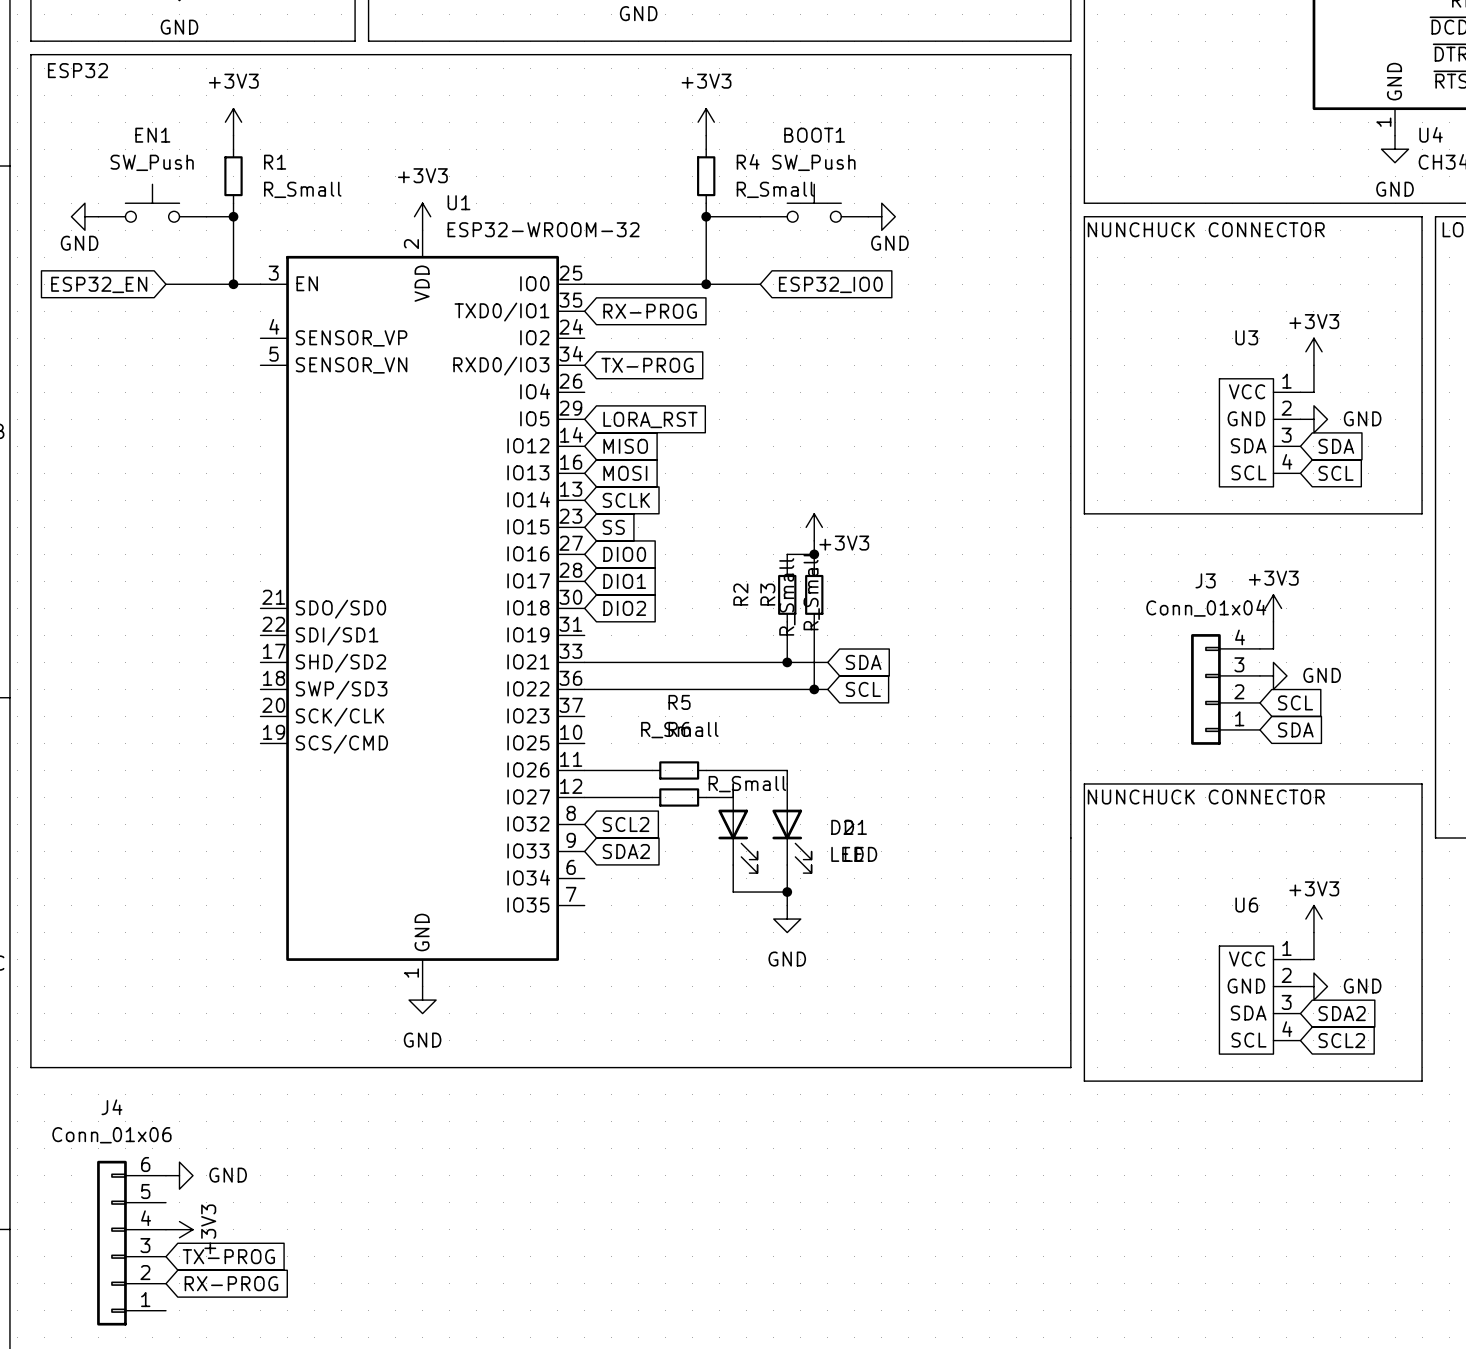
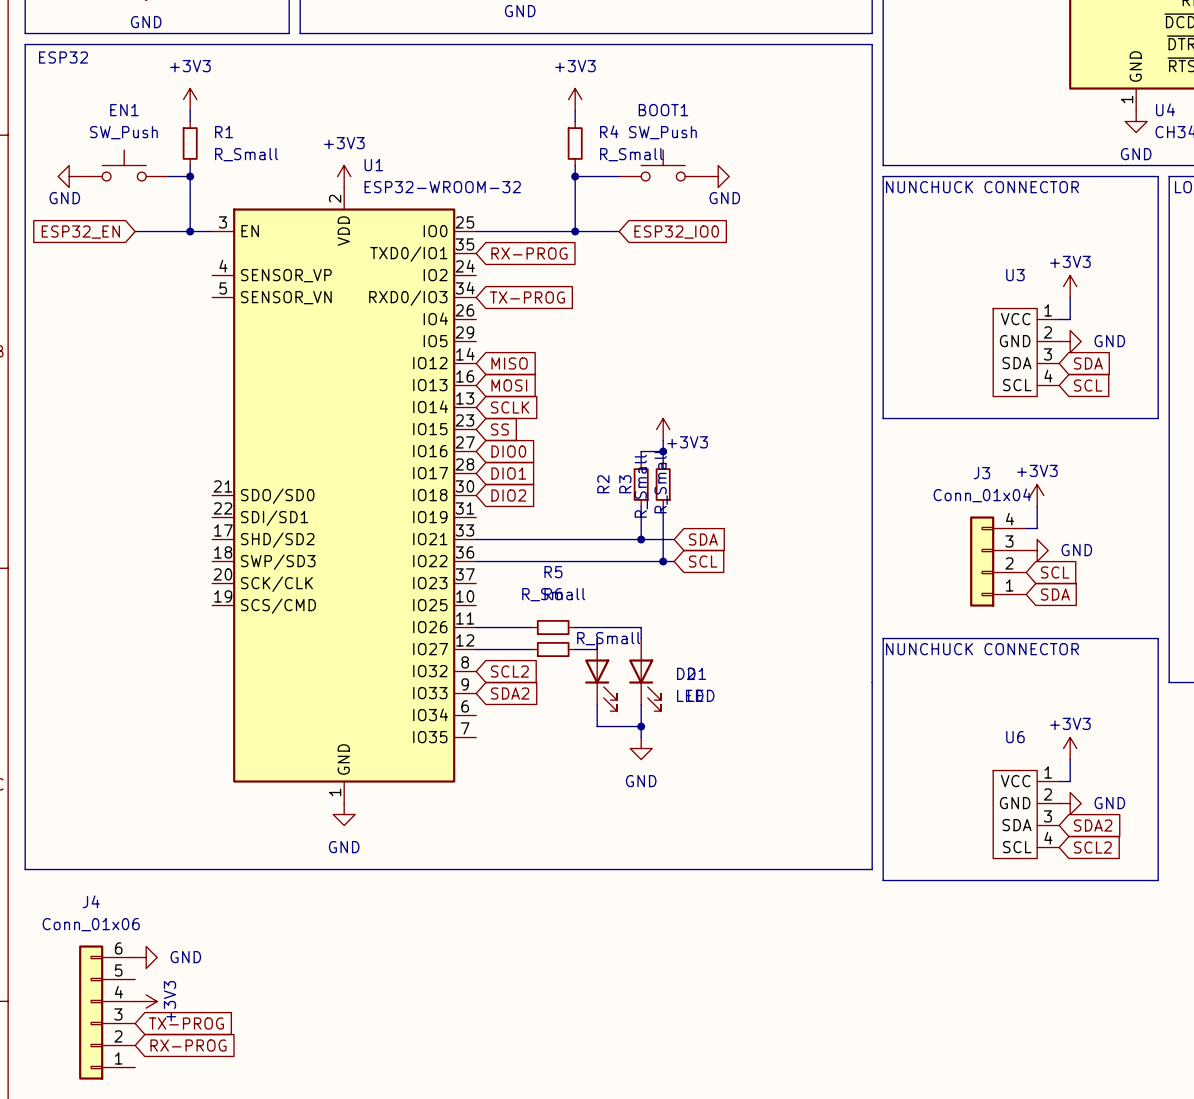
global label: LORA_RST (650, 419) -> none

